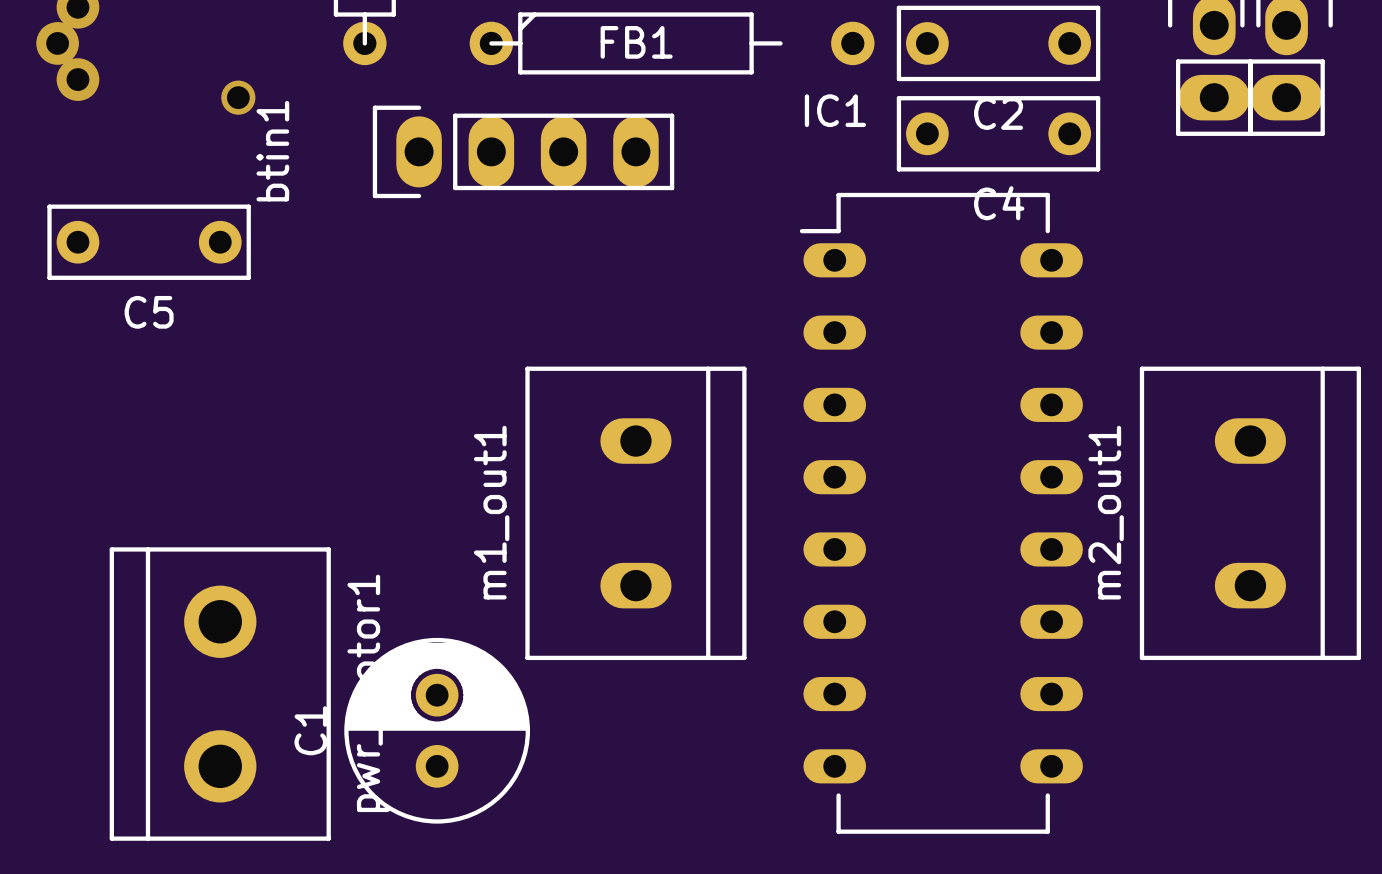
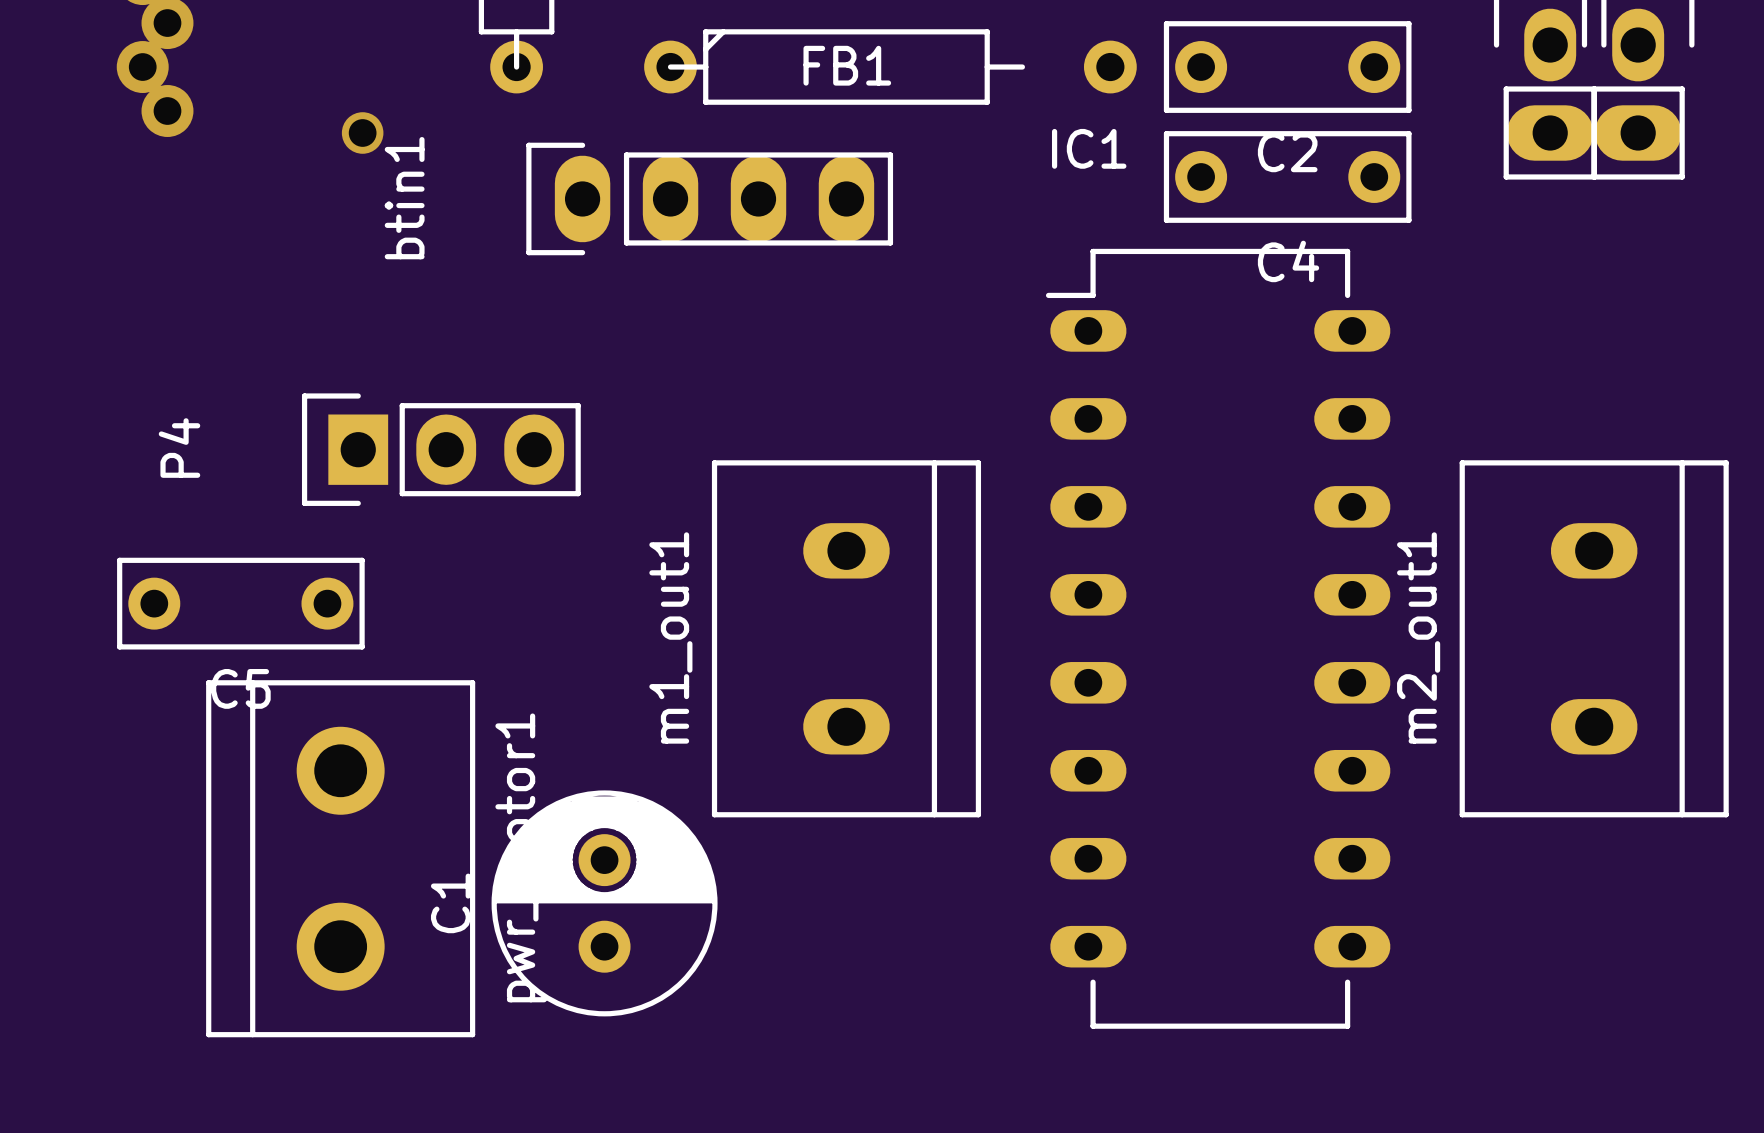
C5 position: (149, 242) -> (240, 603)
P4: none -> (441, 449)

